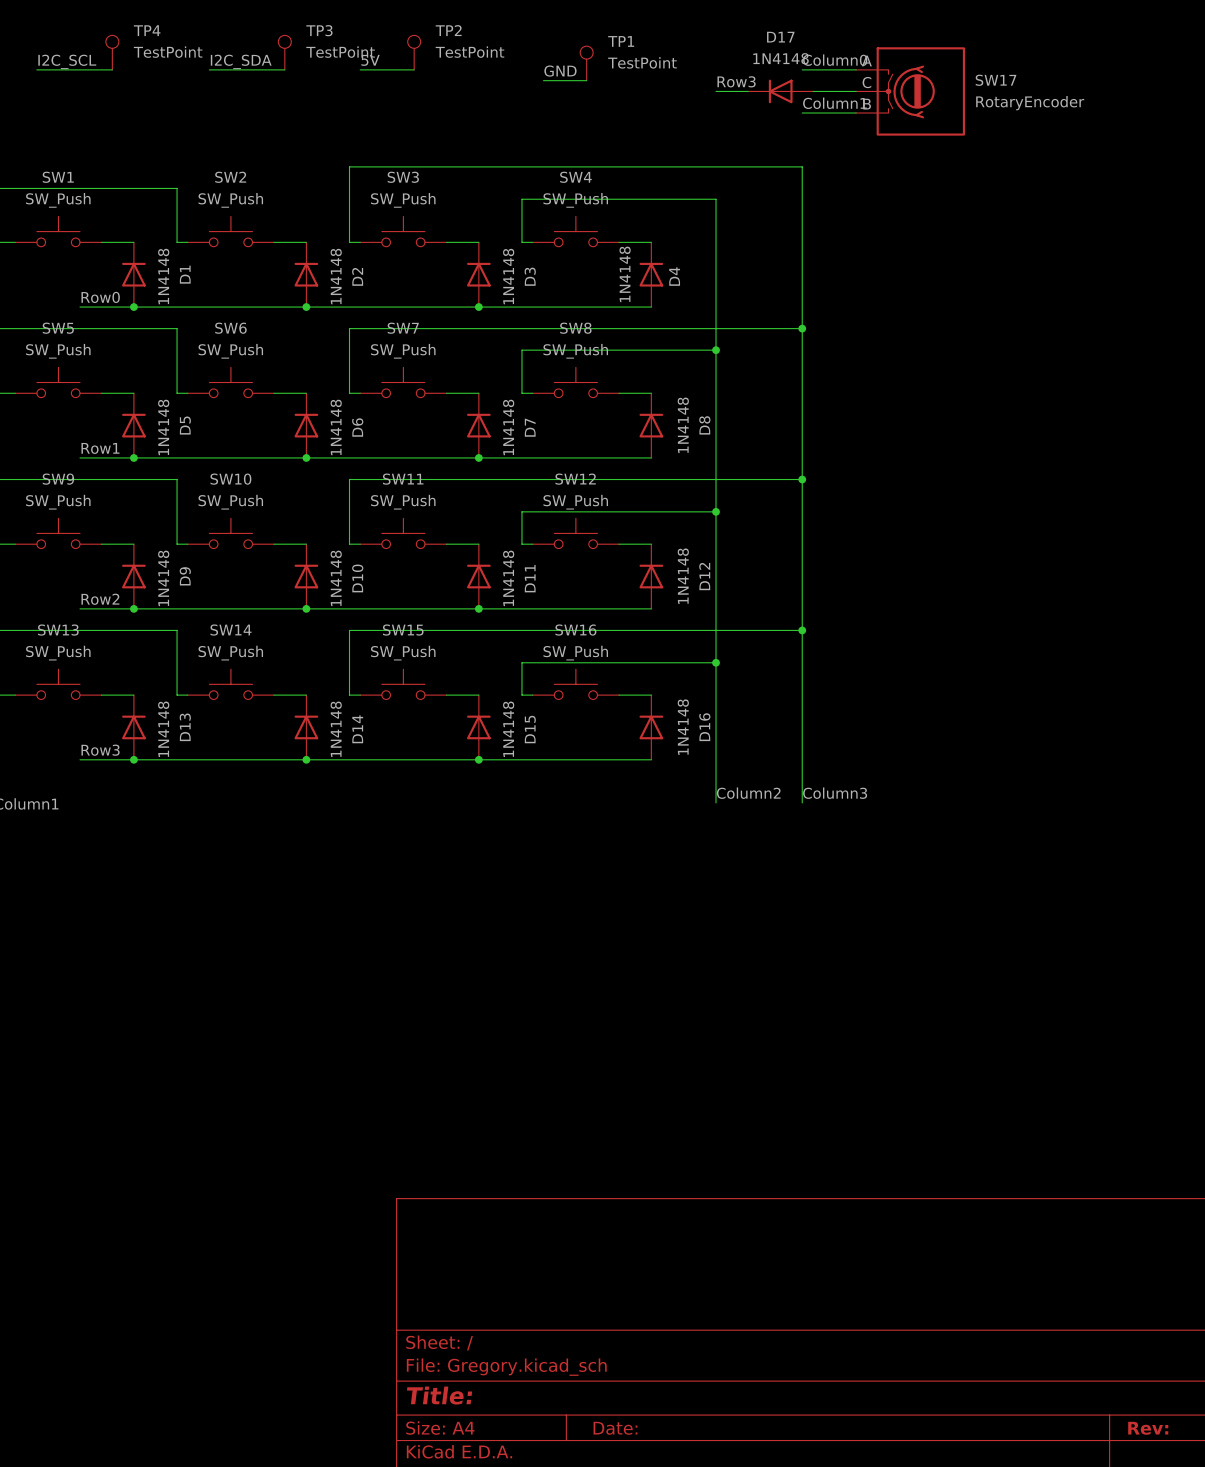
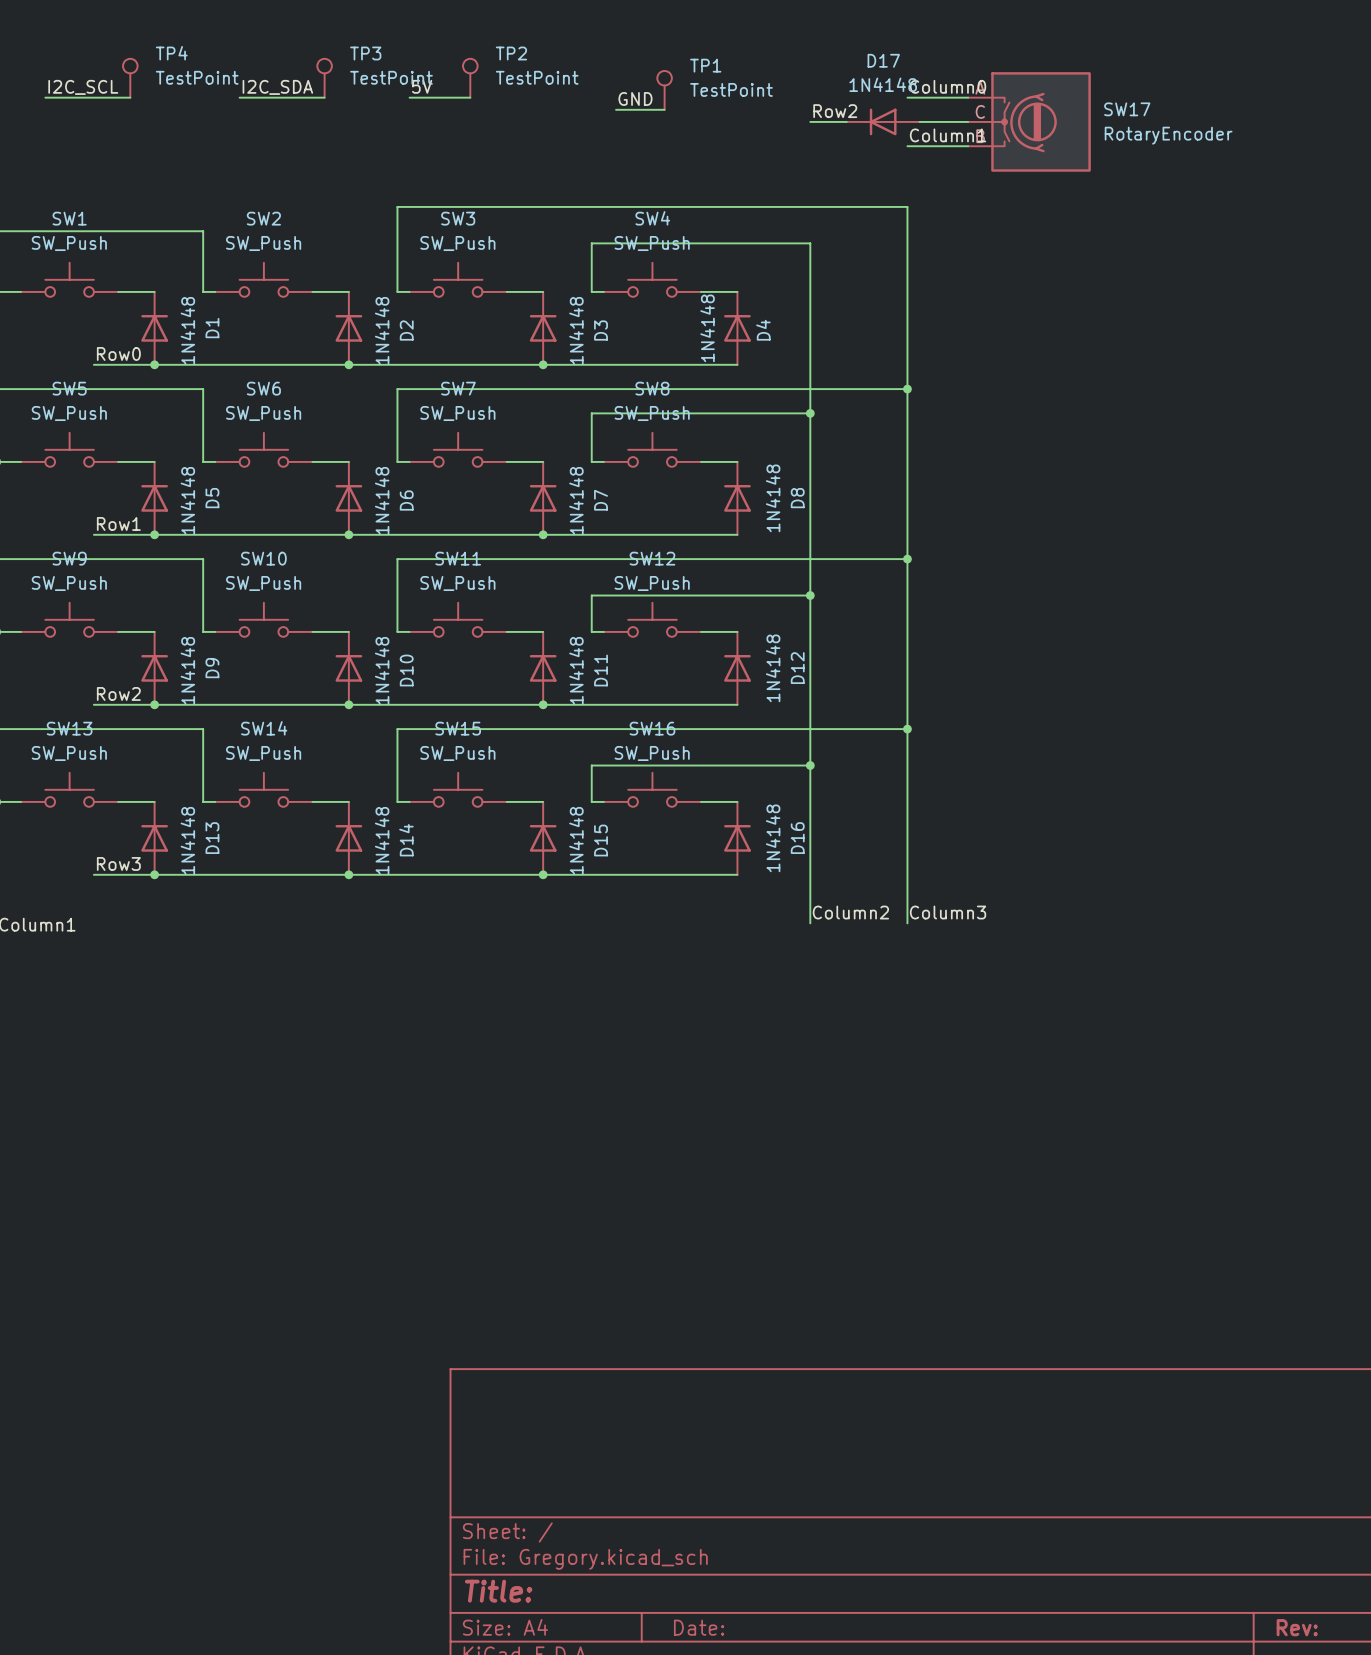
label: Row3 (736, 81) -> Row2 (835, 111)

